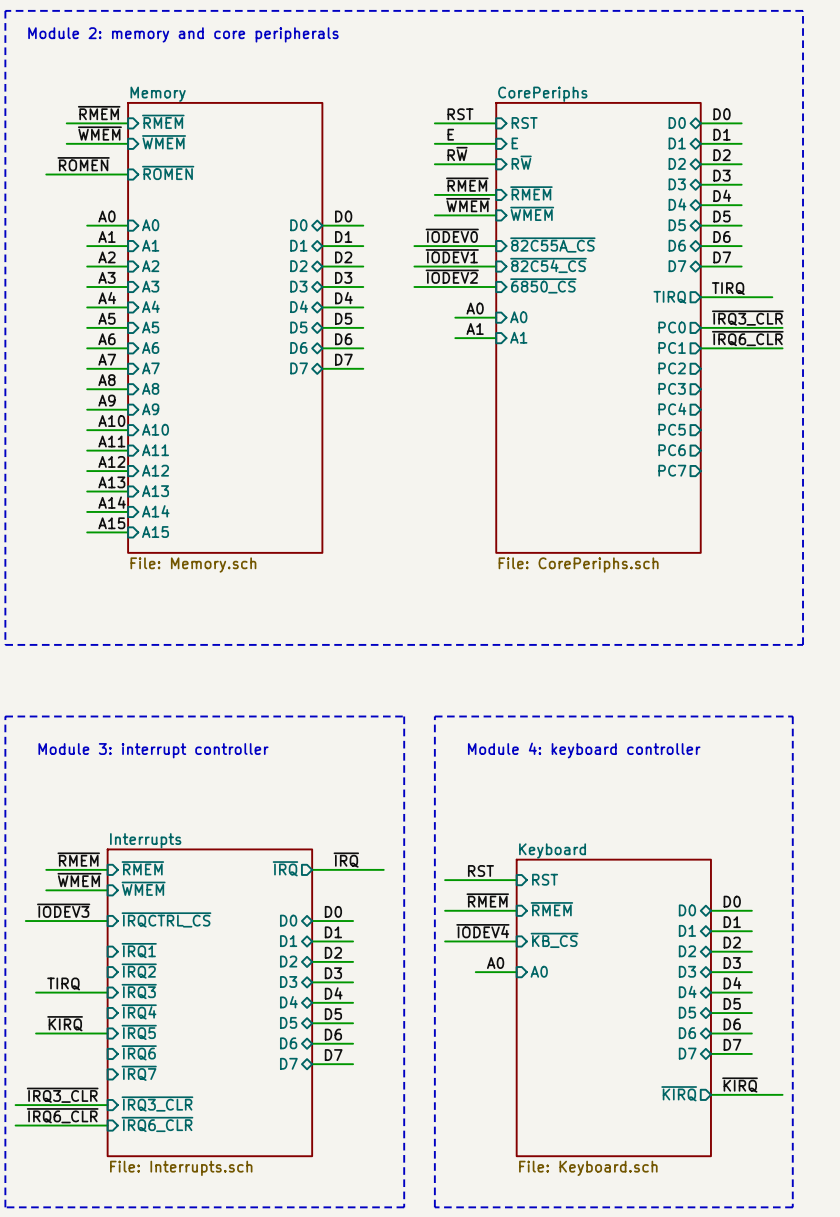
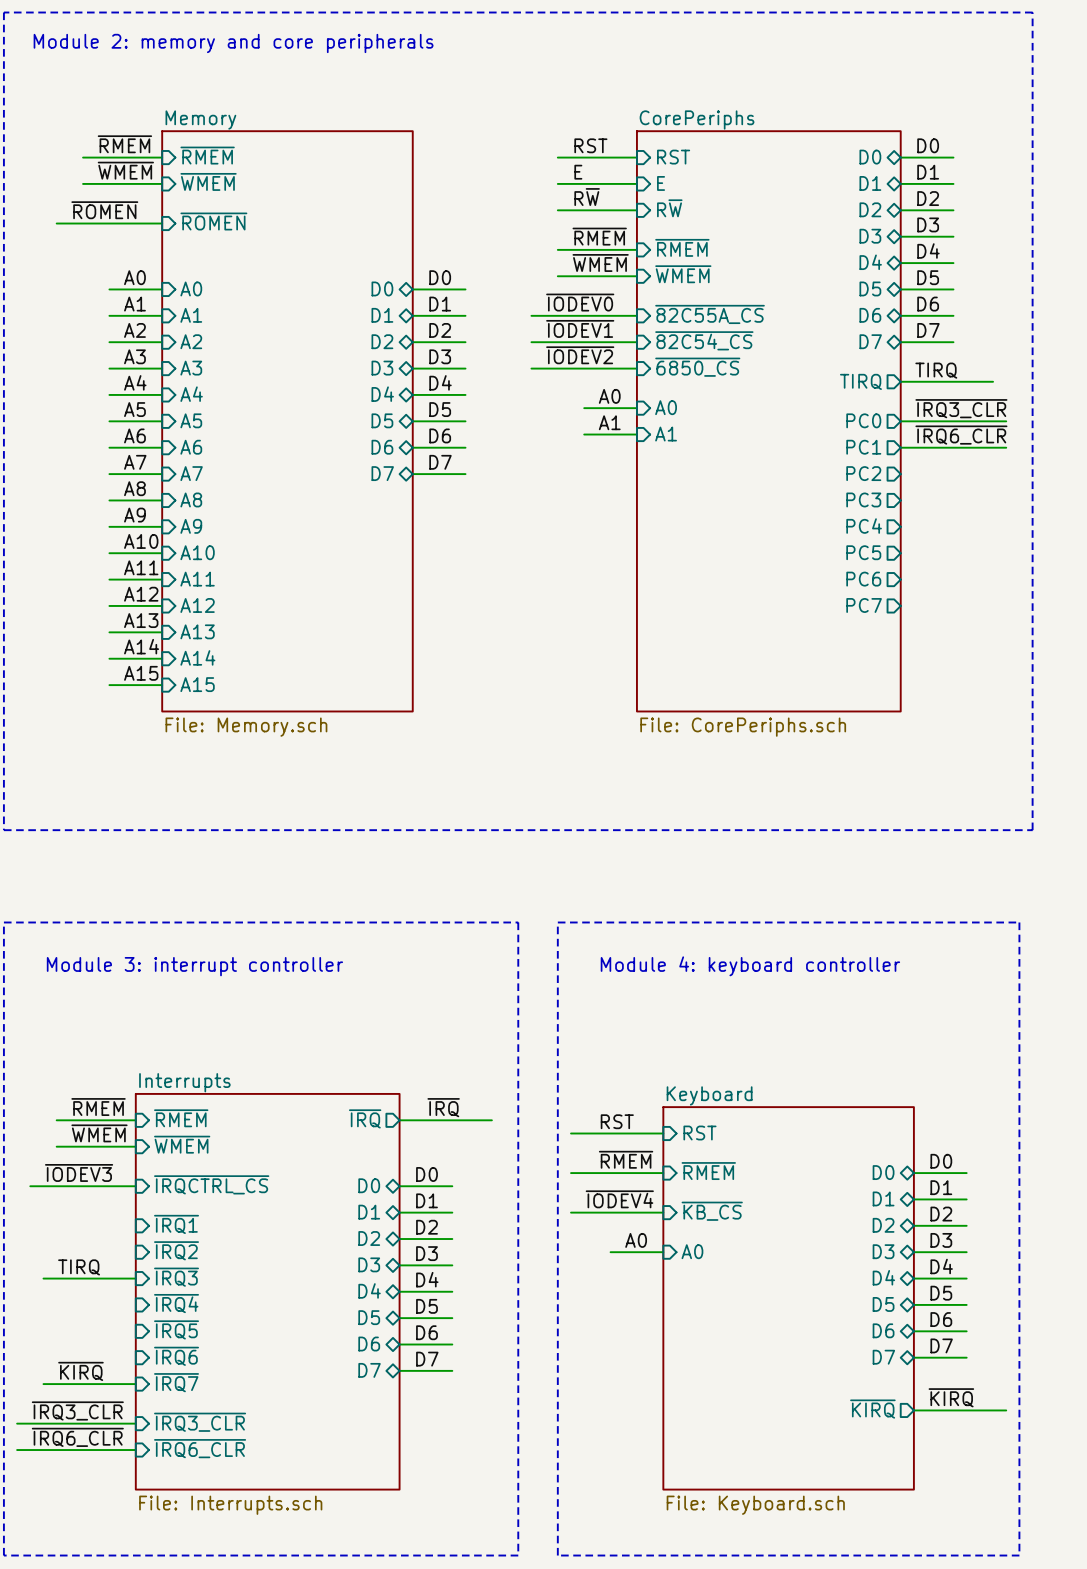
label position: ~{KIRQ} (65, 1023) -> ~{KIRQ} (80, 1371)
wire: (36, 1033) (107, 1033) -> (43, 1384) (135, 1384)

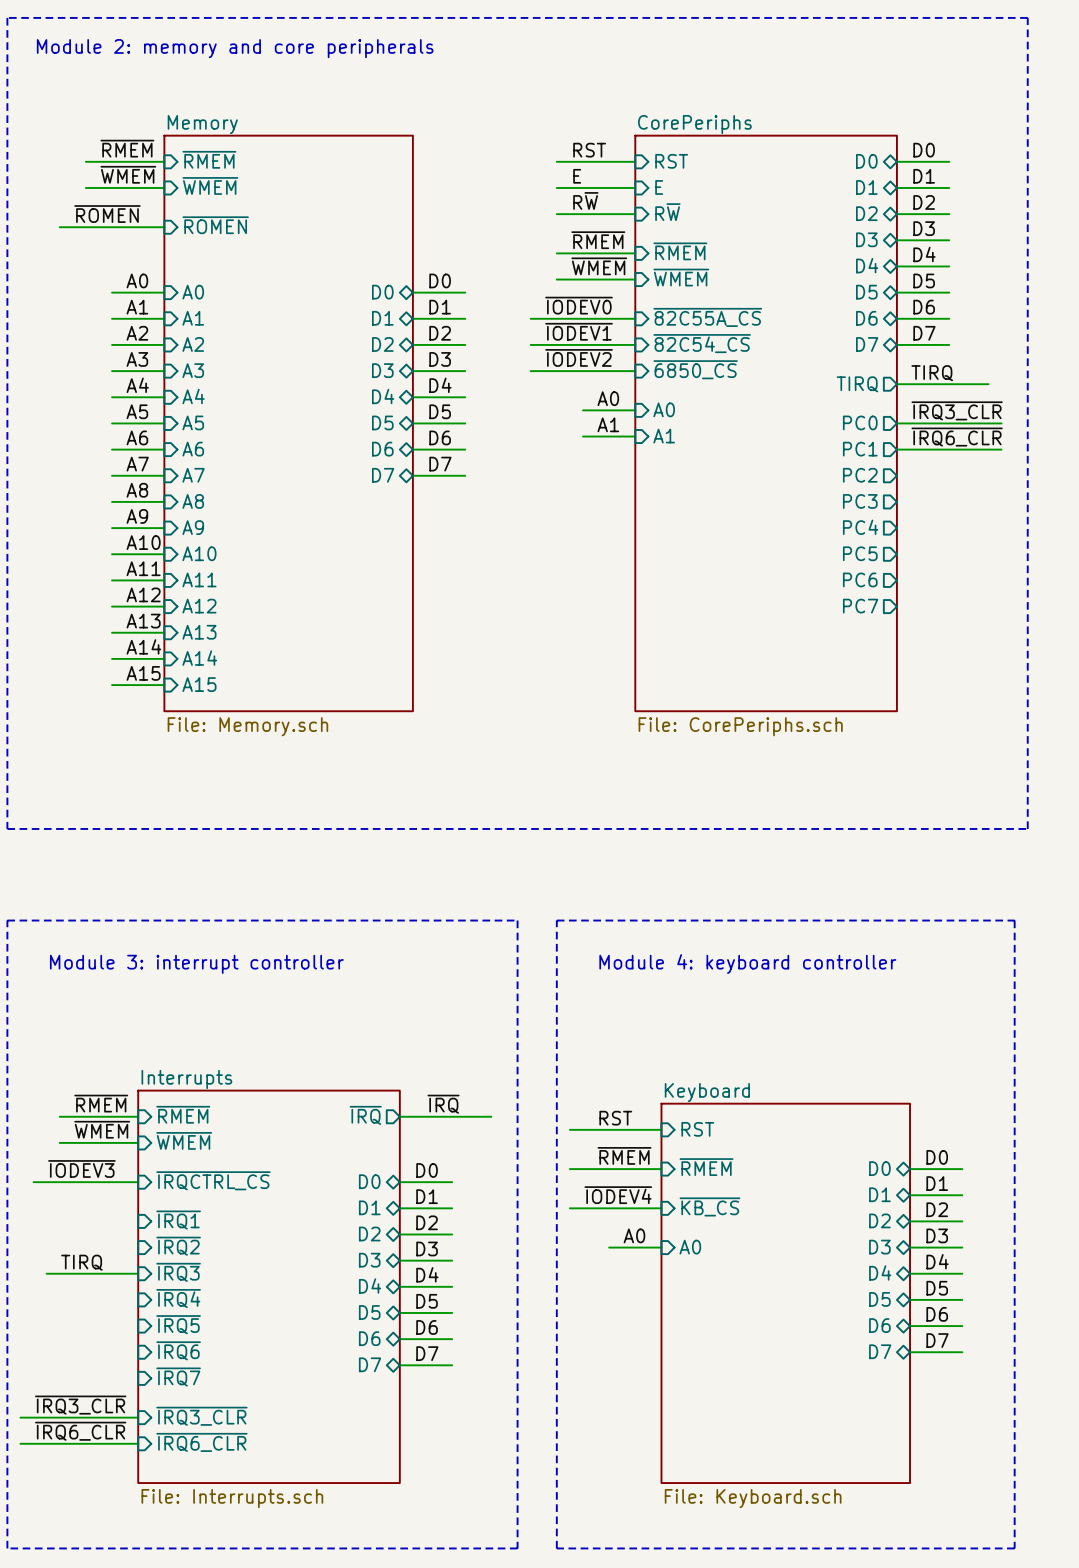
label: ~{KIRQ} (80, 1371) -> none
wire: (43, 1384) (135, 1384) -> none
label: ~{KIRQ} (951, 1397) -> none
sheet pin: ~{KIRQ} (872, 1409) -> none
wire: (913, 1410) (1006, 1410) -> none

